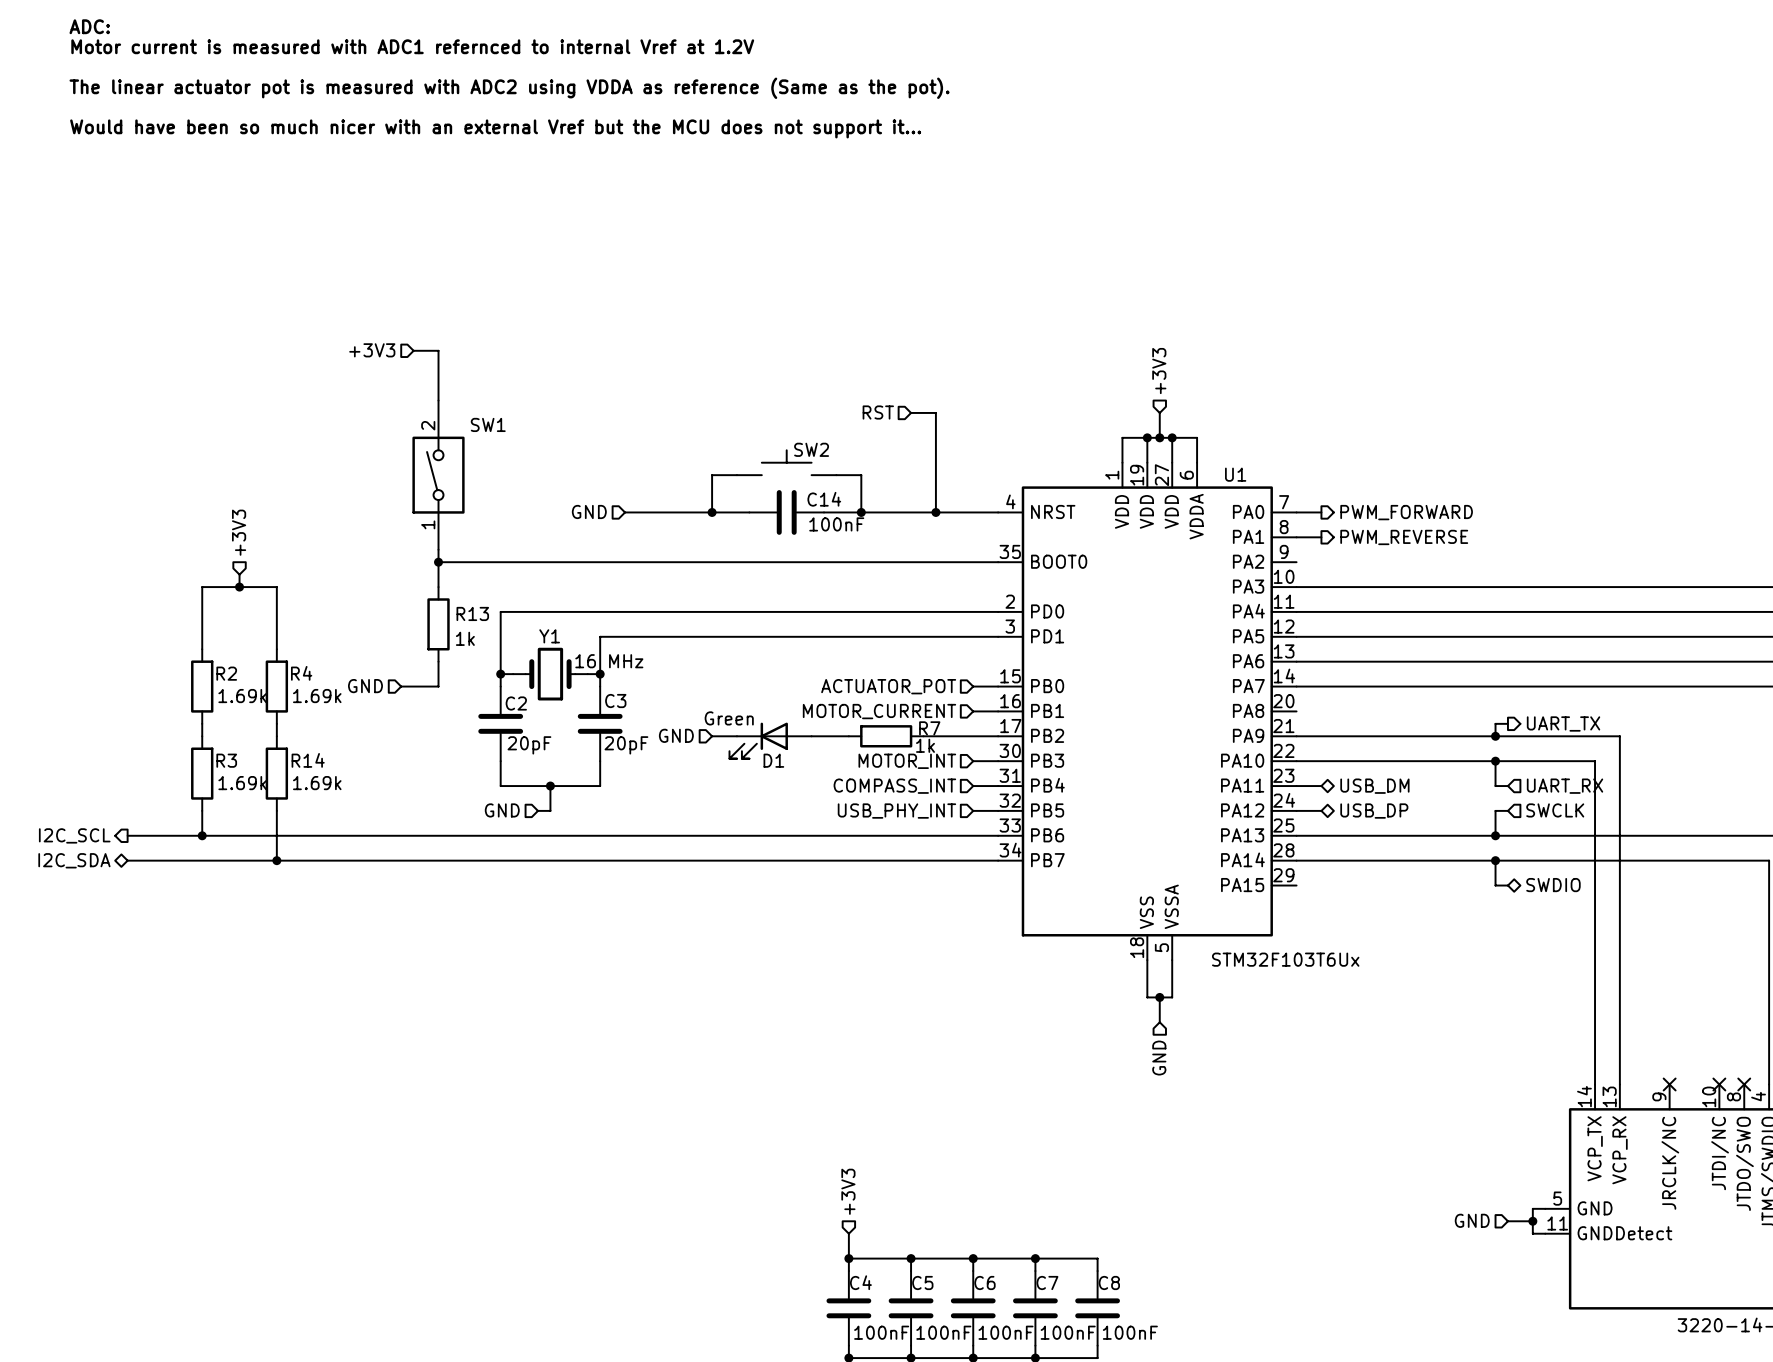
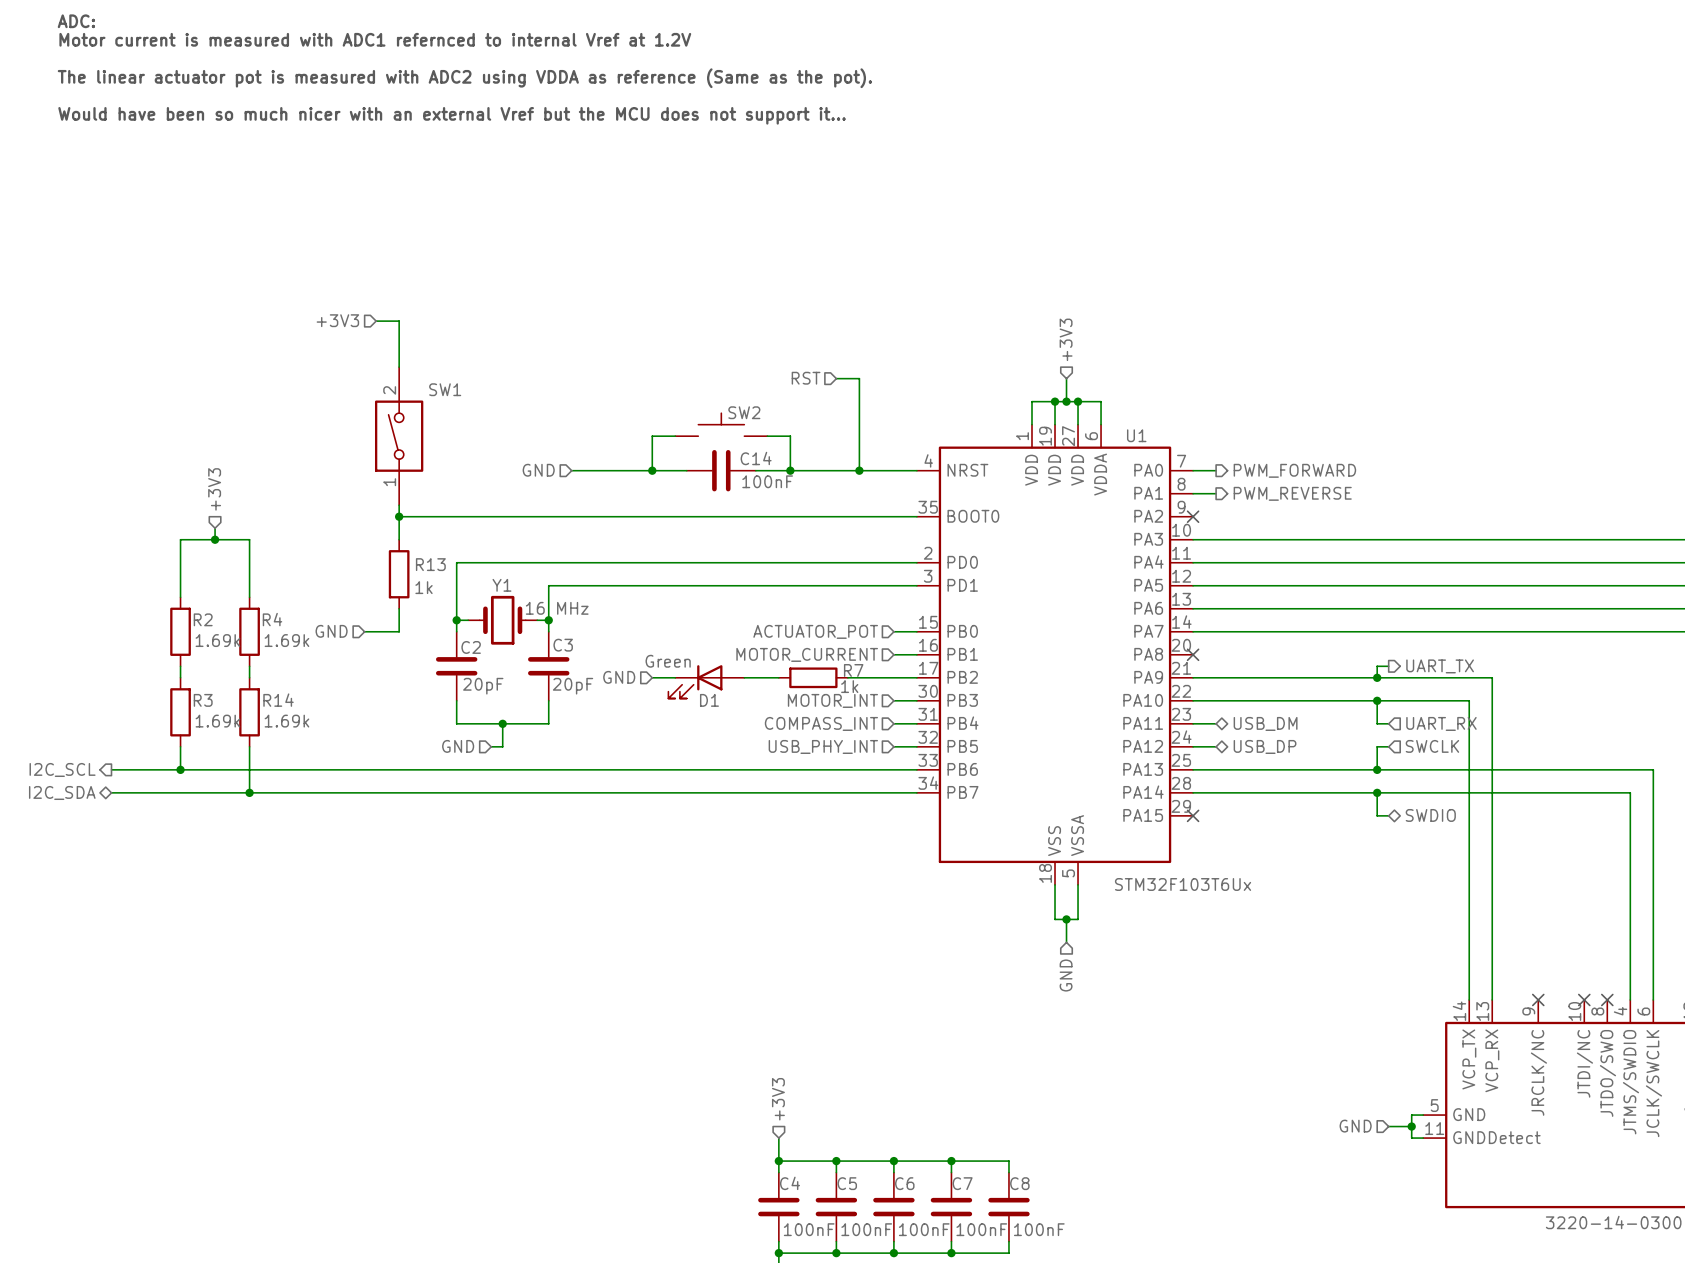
no-connect mark: none -> (1193, 516)
no-connect mark: none -> (1193, 654)
no-connect mark: none -> (1193, 815)

